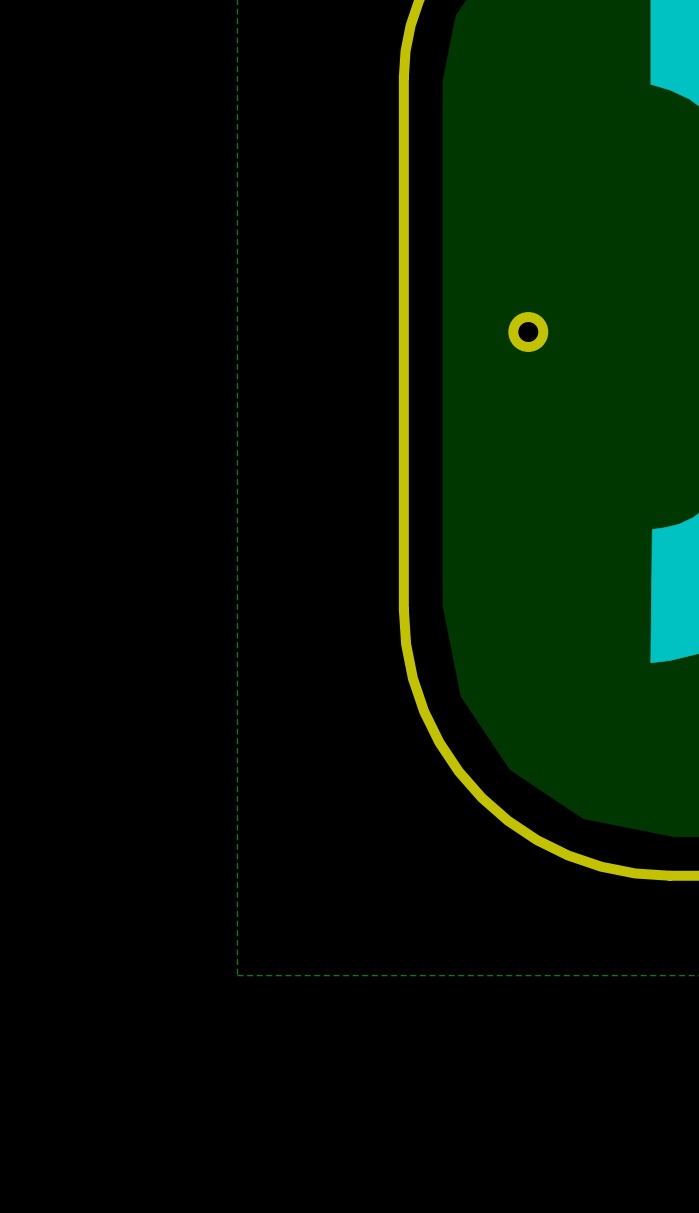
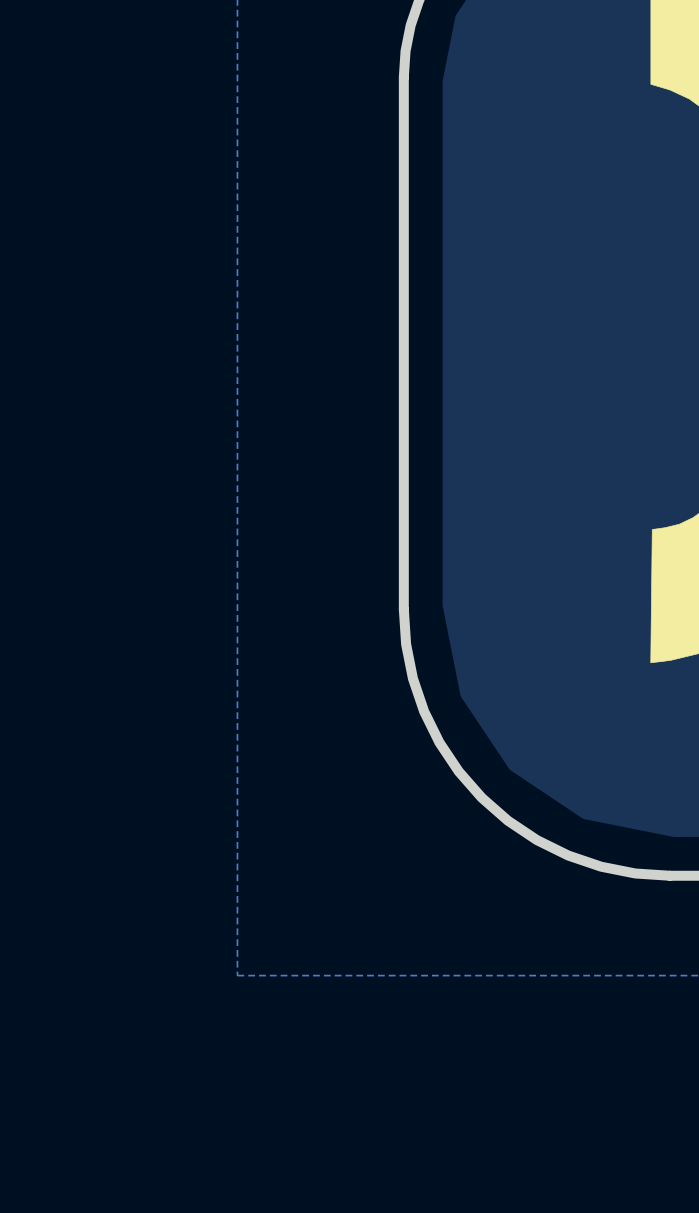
part: (528, 332) -> none

